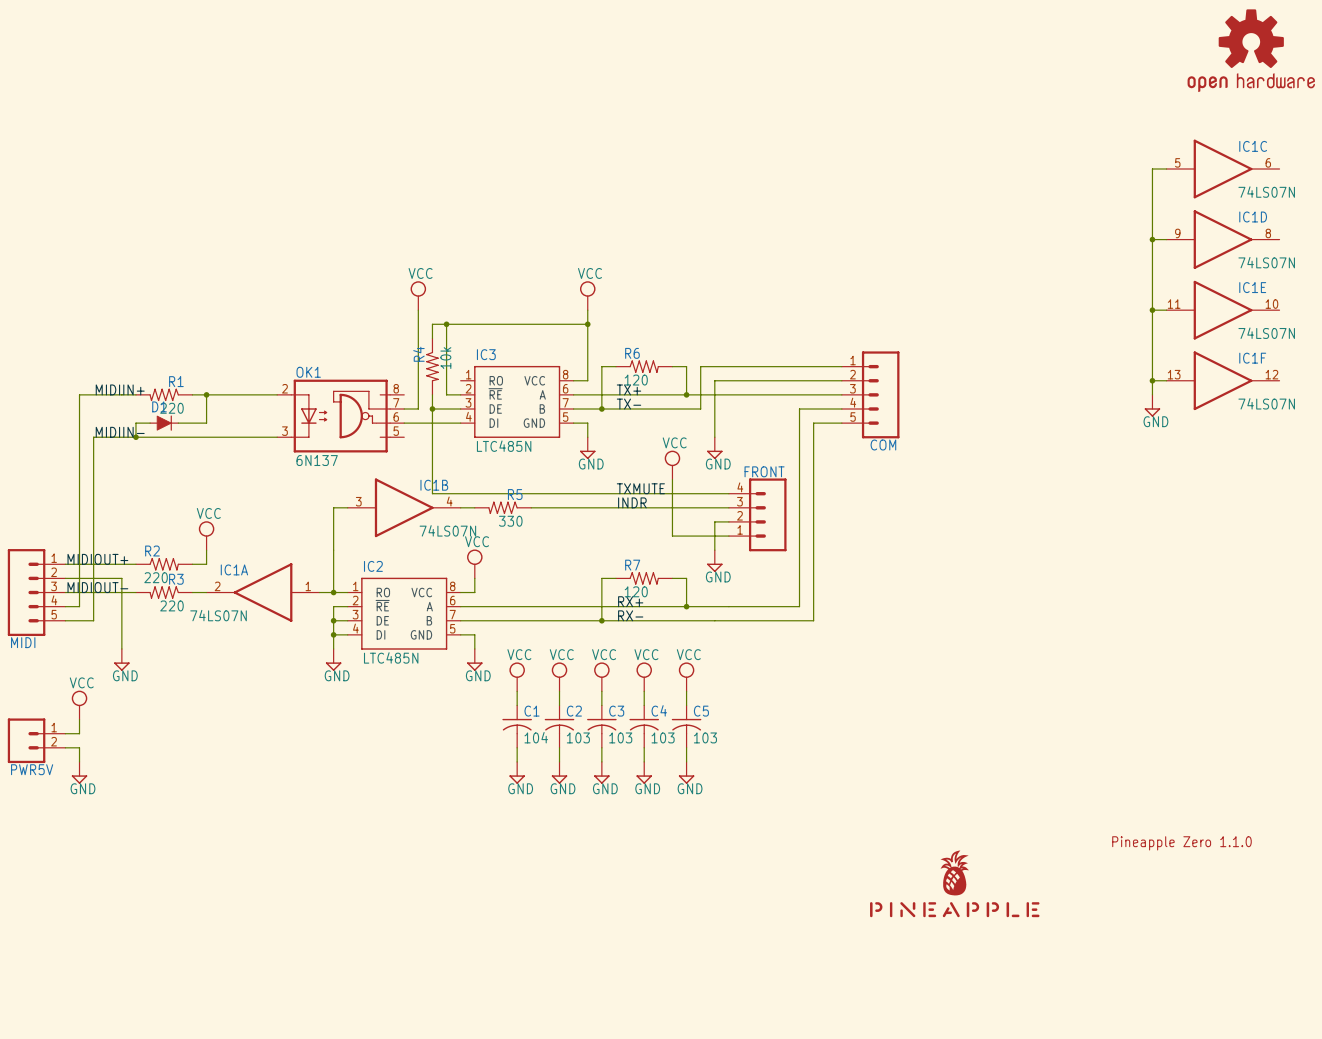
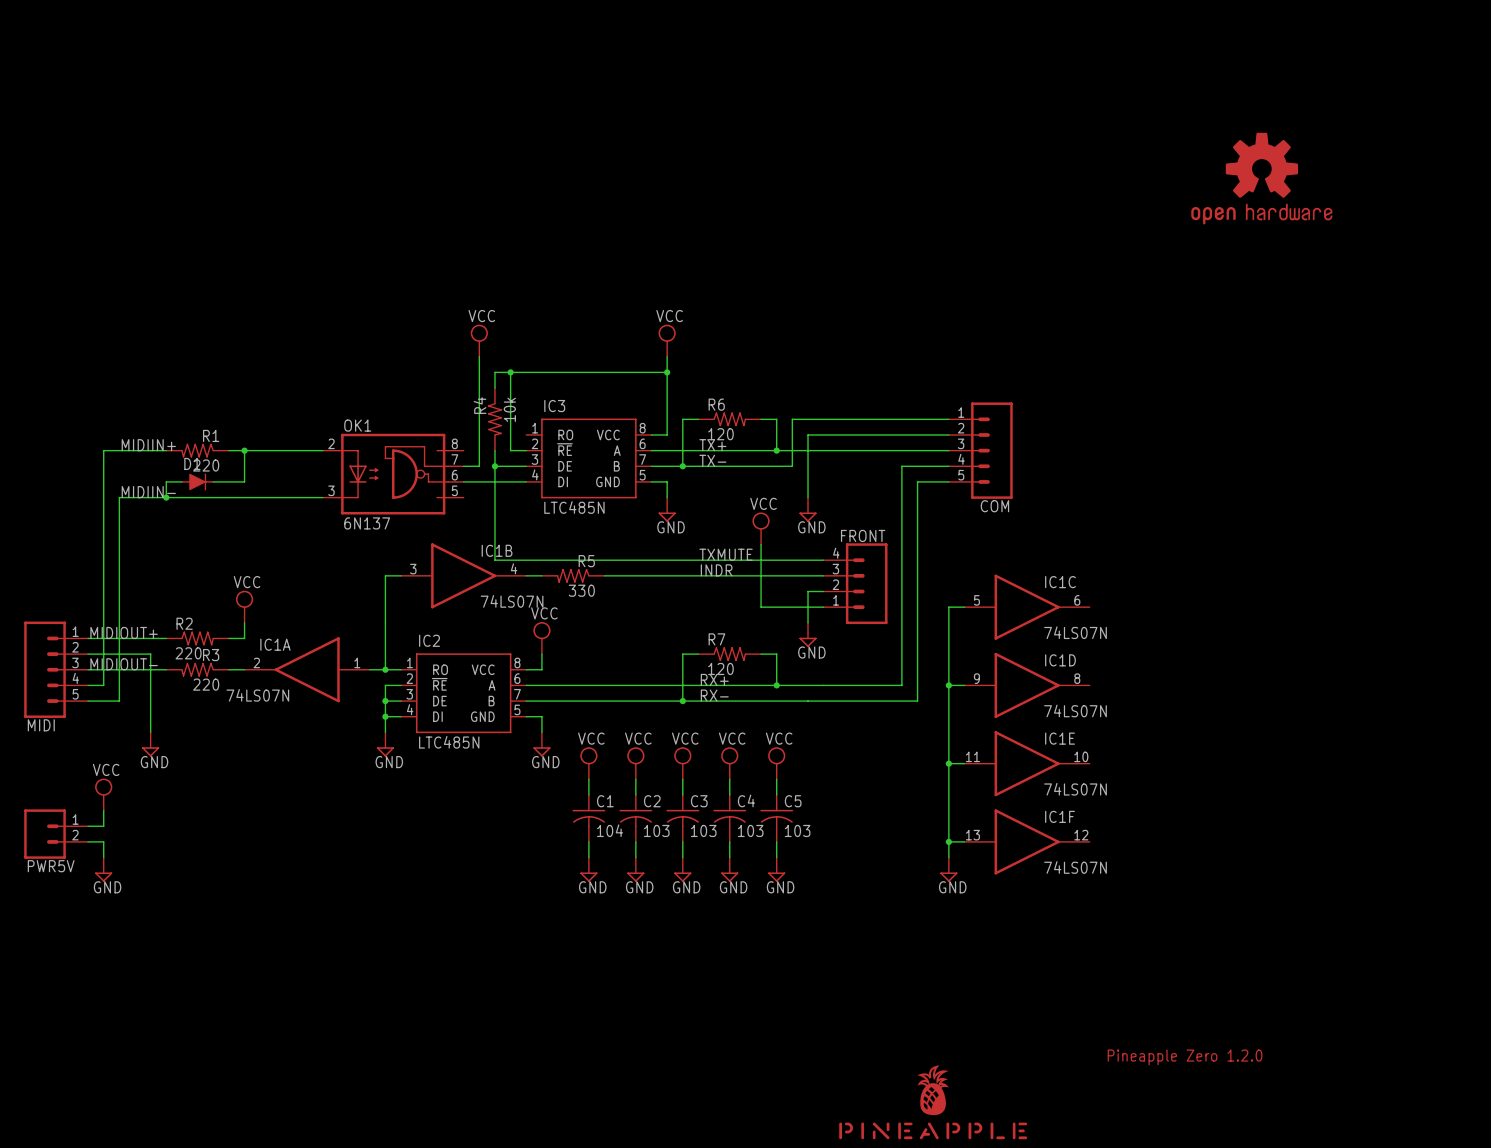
part: (1251, 50) -> none
part: none -> (1261, 178)
wire: (1166, 169) (1152, 169) (1152, 394) -> none
IC1C position: (1223, 169) -> (1027, 607)
wire: (1152, 239) (1166, 239) -> none
junction: (1152, 239) -> none
IC1D position: (1223, 239) -> (1027, 685)
wire: (1152, 310) (1166, 310) -> none
junction: (1152, 310) -> none
IC1E position: (1223, 310) -> (1027, 763)
wire: (1152, 380) (1166, 380) -> none
junction: (1152, 380) -> none
IC1F position: (1223, 380) -> (1027, 841)
power symbol: GND (1152, 405) -> none
wire: none -> (964, 607) (948, 607) (948, 857)
wire: none -> (948, 685) (964, 685)
junction: none -> (948, 685)
wire: none -> (948, 763) (964, 763)
junction: none -> (948, 763)
wire: none -> (948, 841) (964, 841)
junction: none -> (948, 841)
power symbol: none -> GND (948, 869)
text: Pineapple Zero 1.1.0 (1181, 843) -> none
part: (954, 883) -> none
text: none -> Pineapple Zero 1.2.0 (1185, 1057)
part: none -> (933, 1102)

